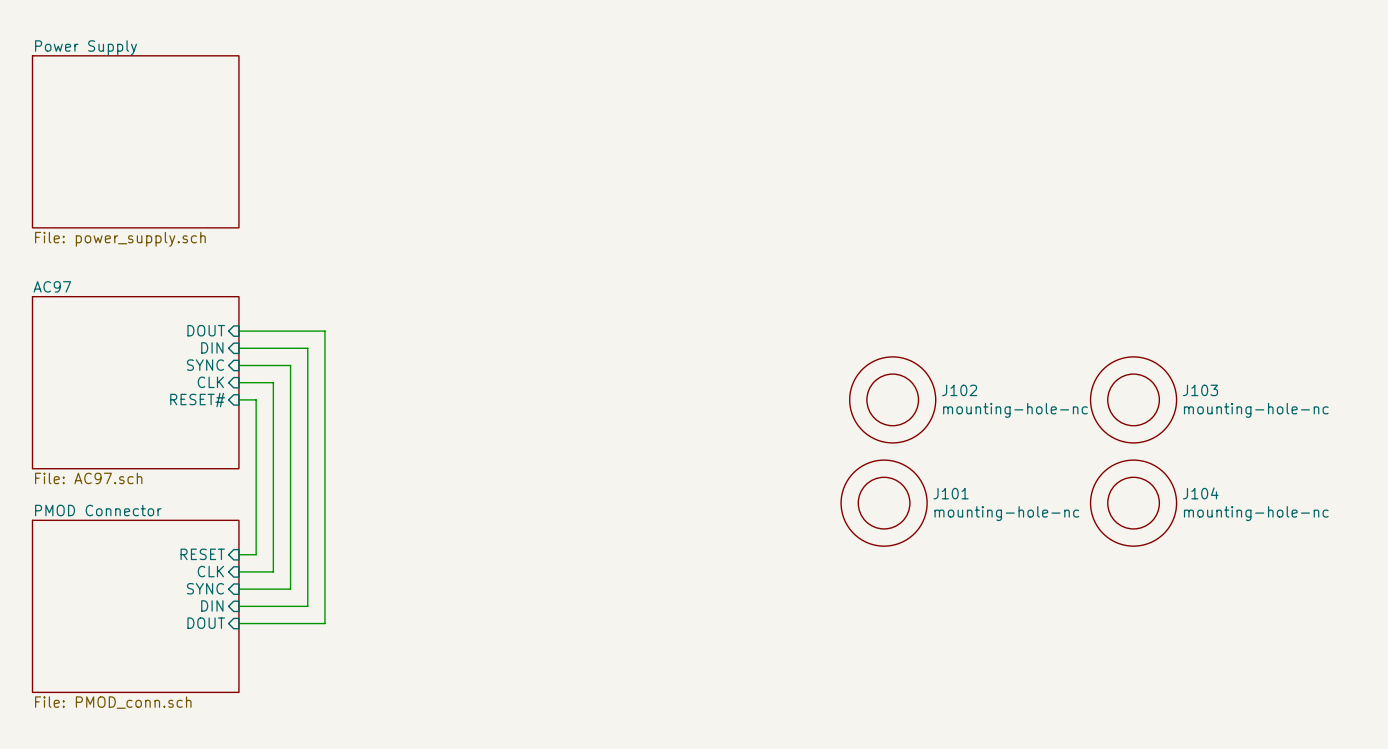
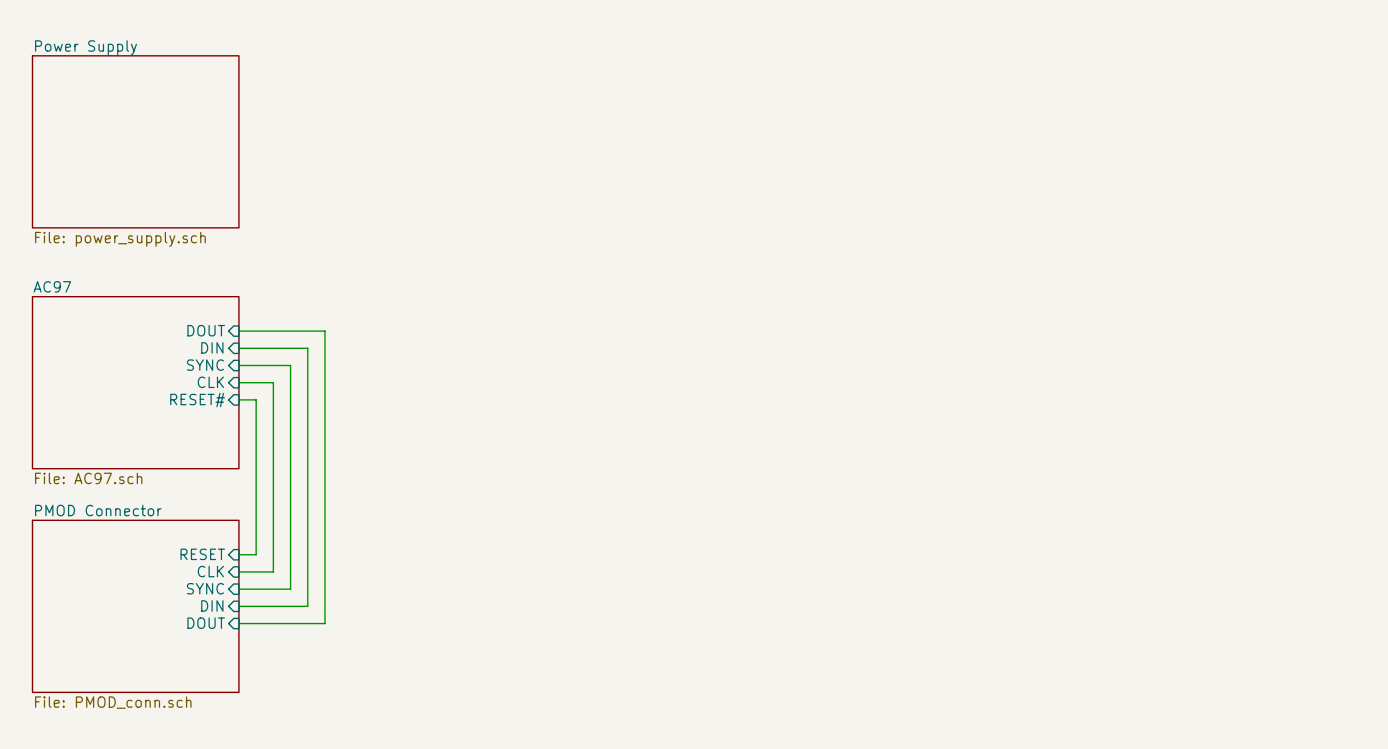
J102: mounting-hole-nc (892, 399) -> none
J103: mounting-hole-nc (1133, 399) -> none
J101: mounting-hole-nc (884, 503) -> none
J104: mounting-hole-nc (1133, 503) -> none

